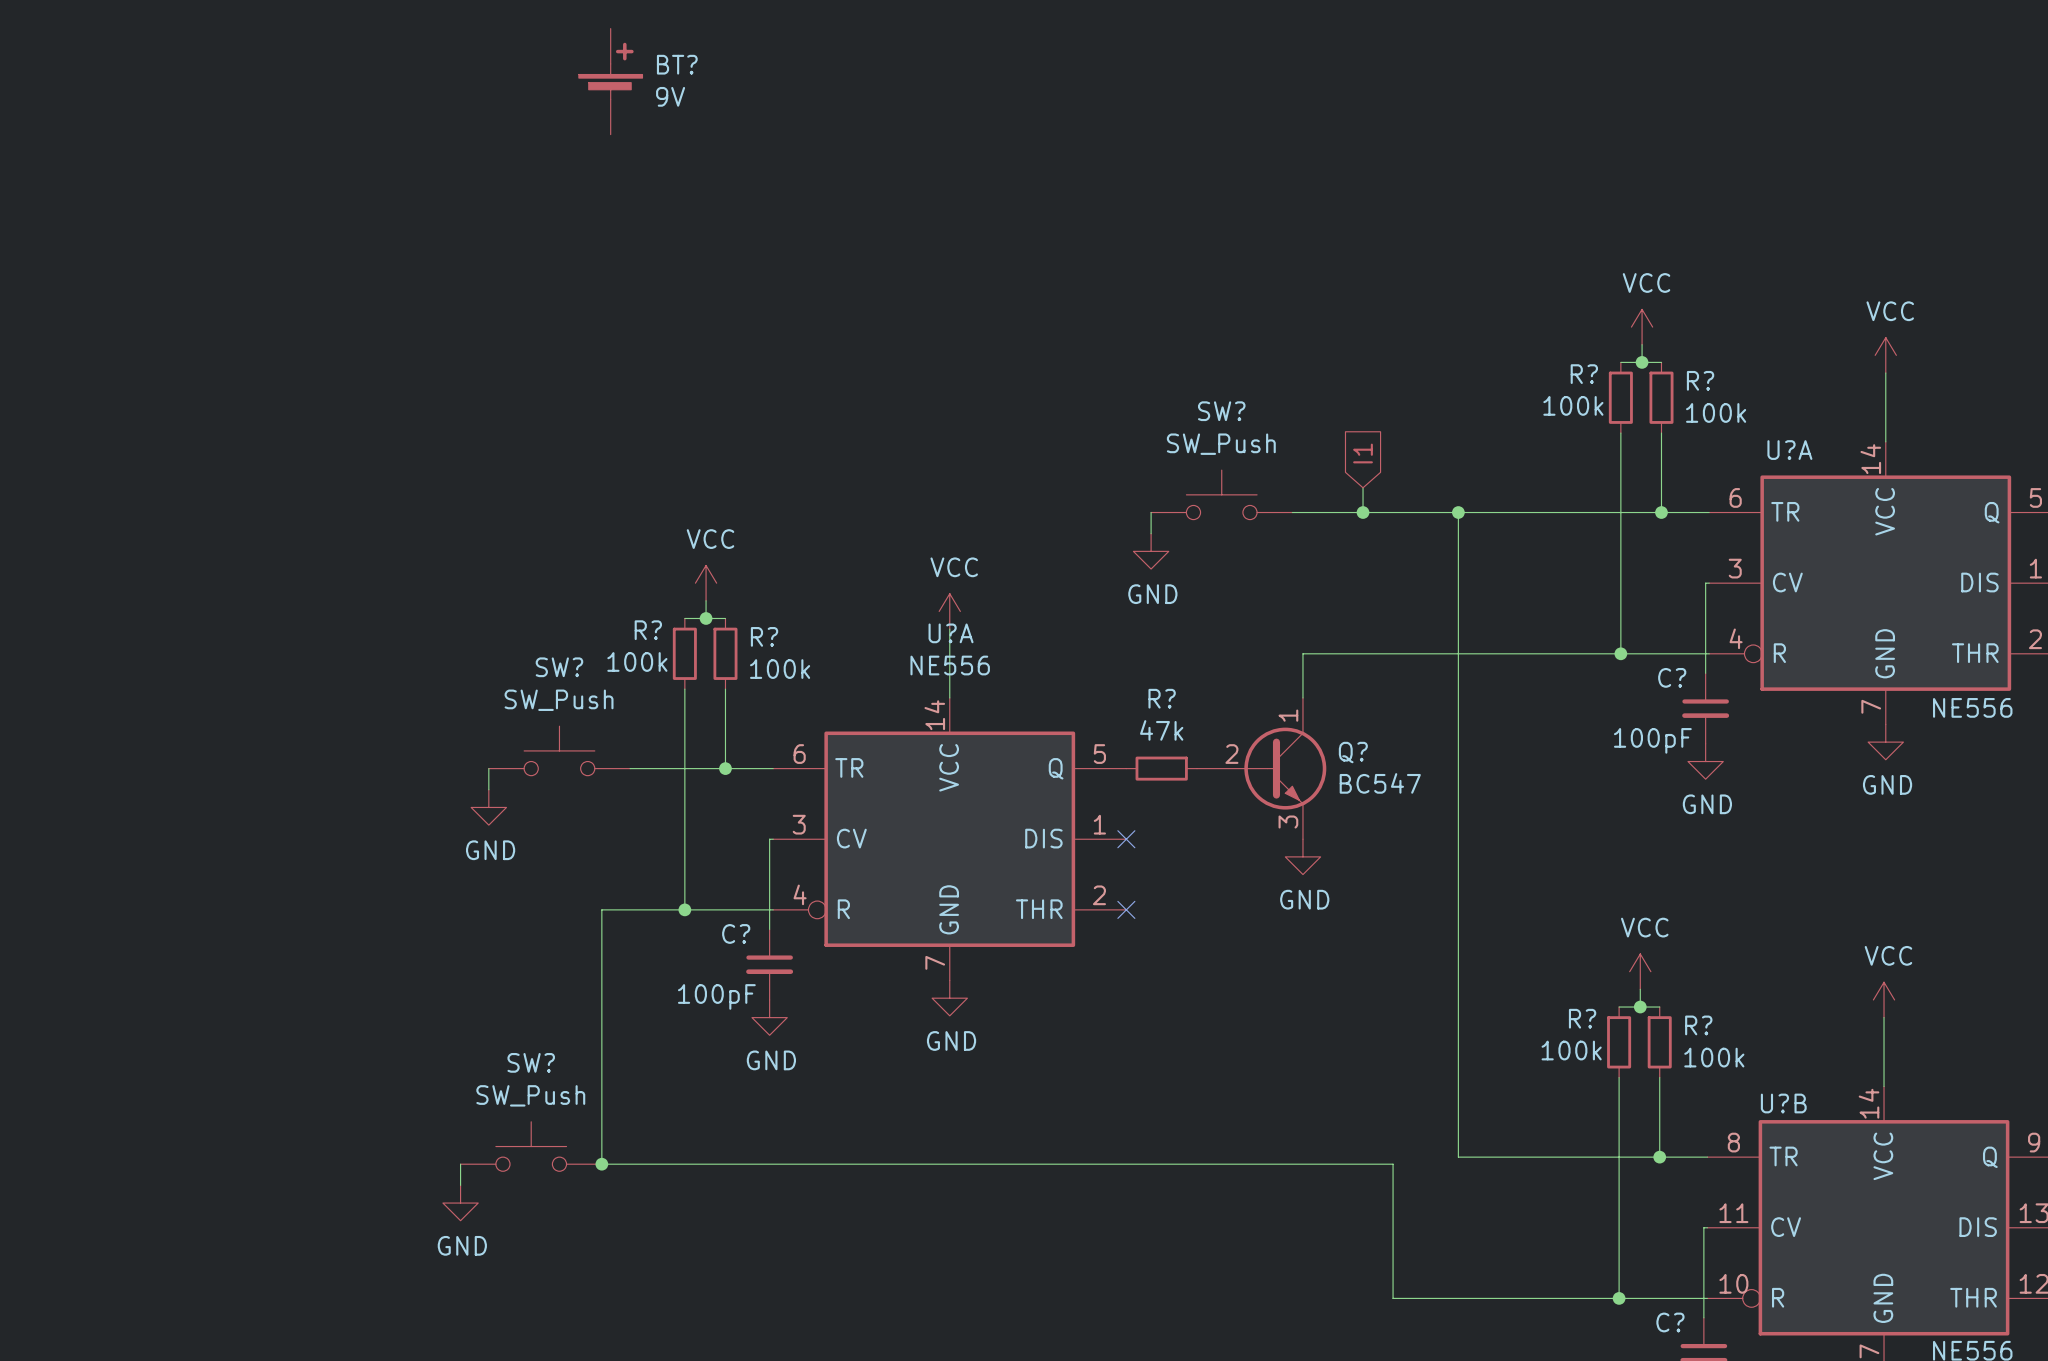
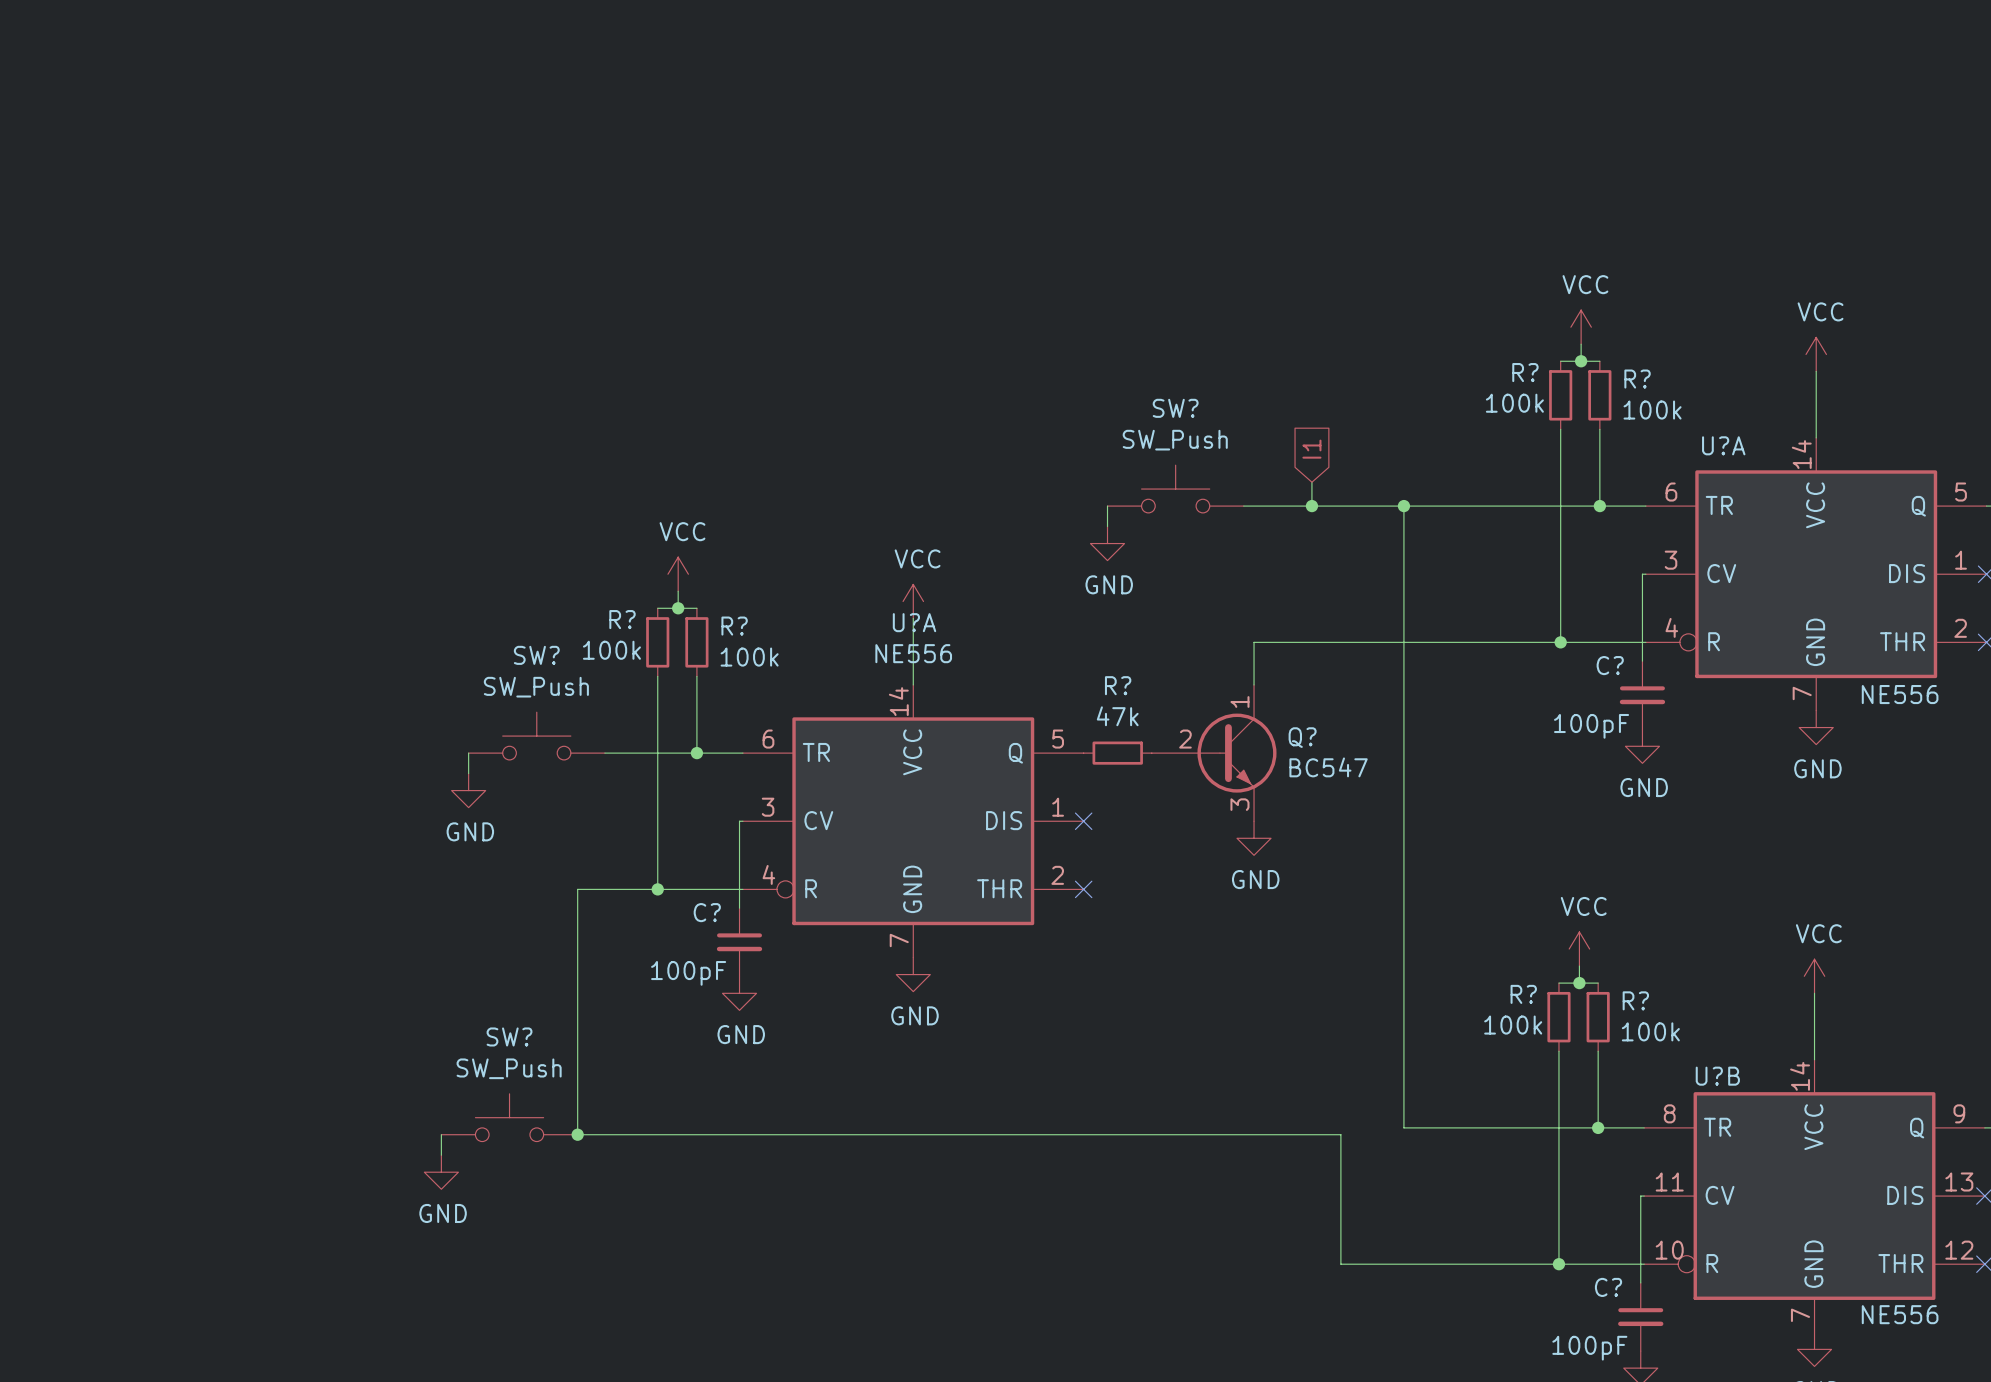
BT?: 9V (610, 81) -> none

